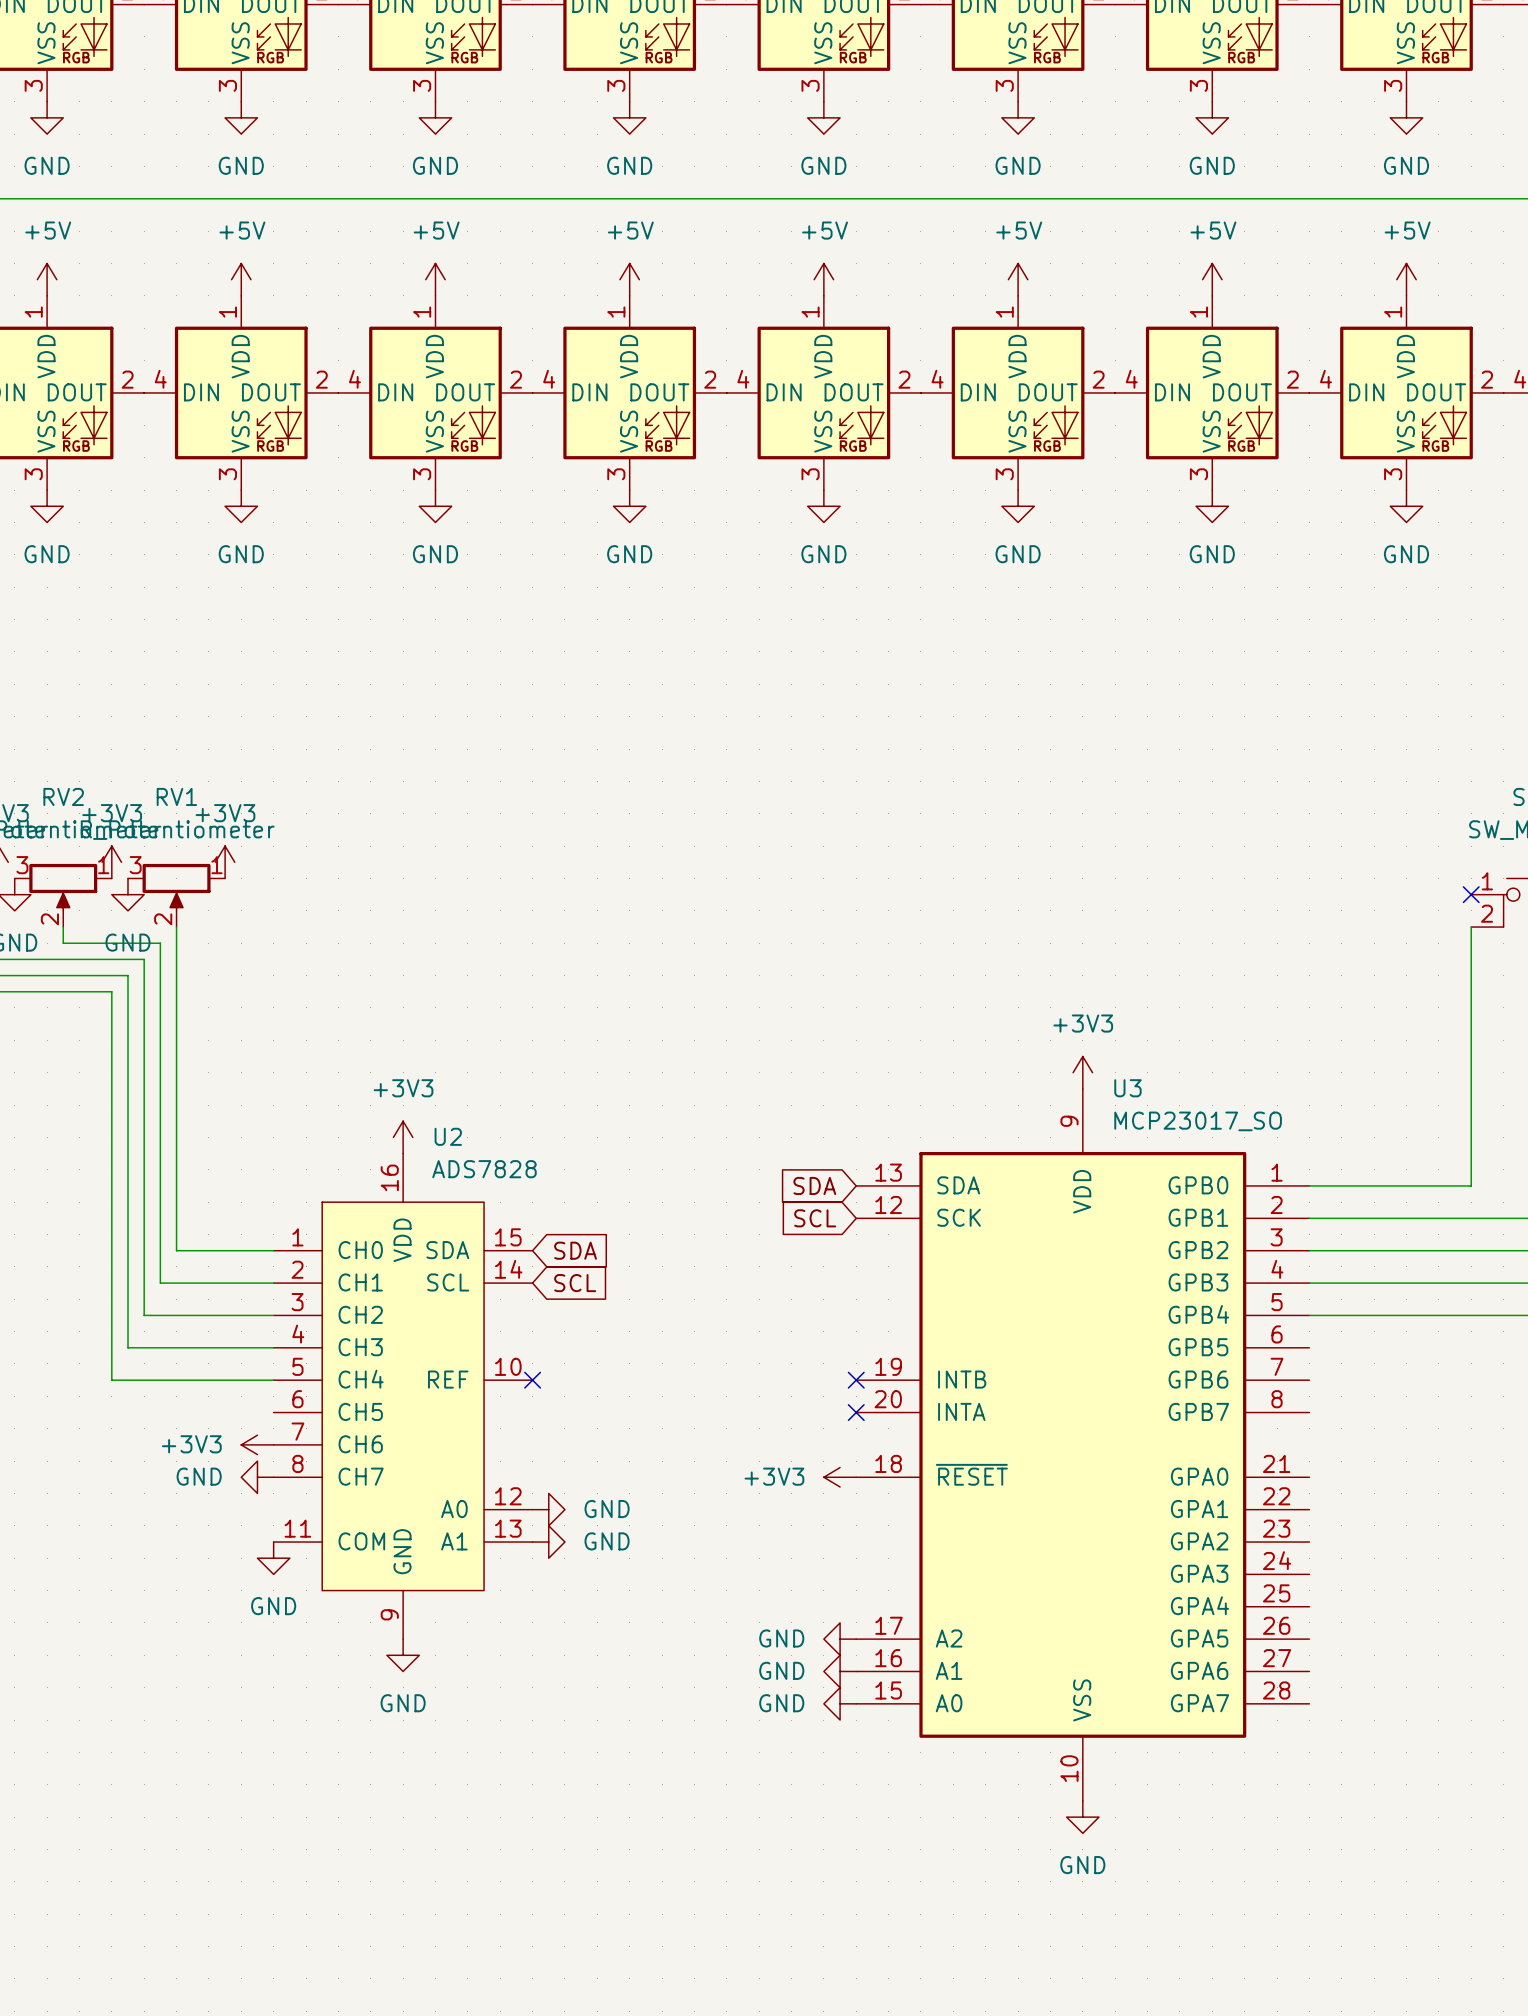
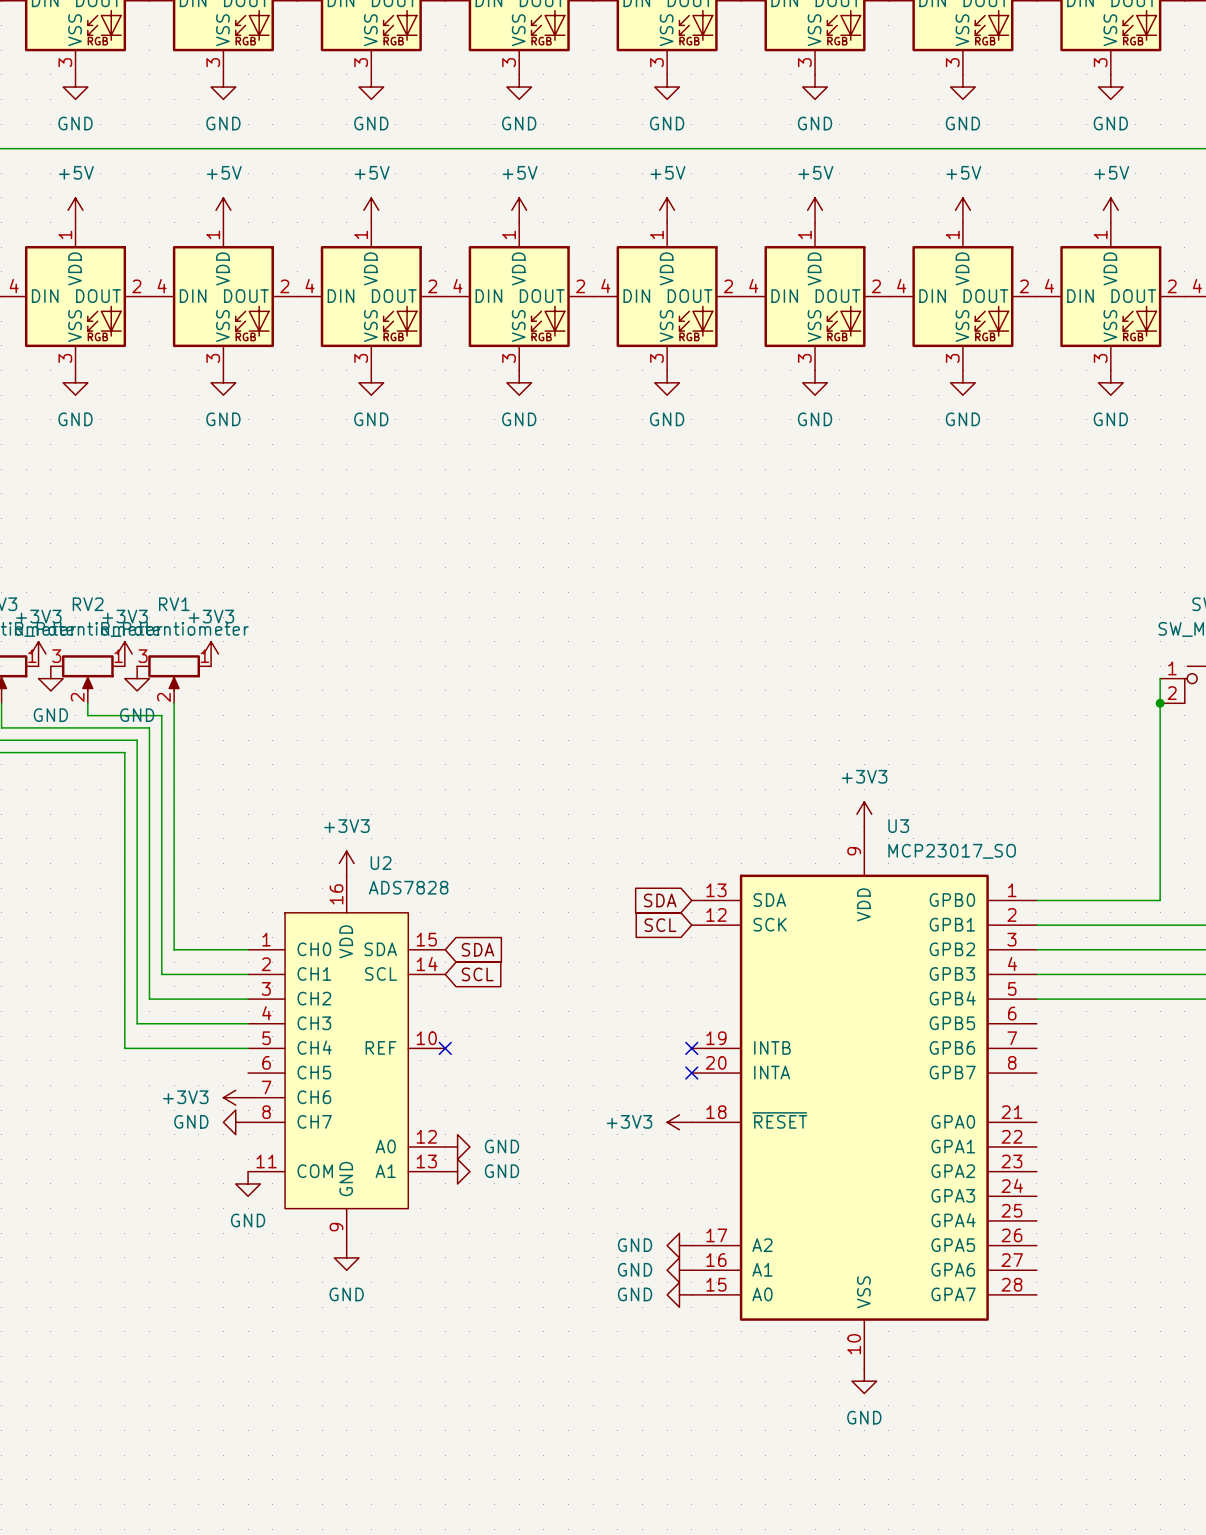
wire: none -> (1160, 678) (1160, 703)
no-connect mark: (1471, 894) -> none
junction: none -> (1160, 703)

